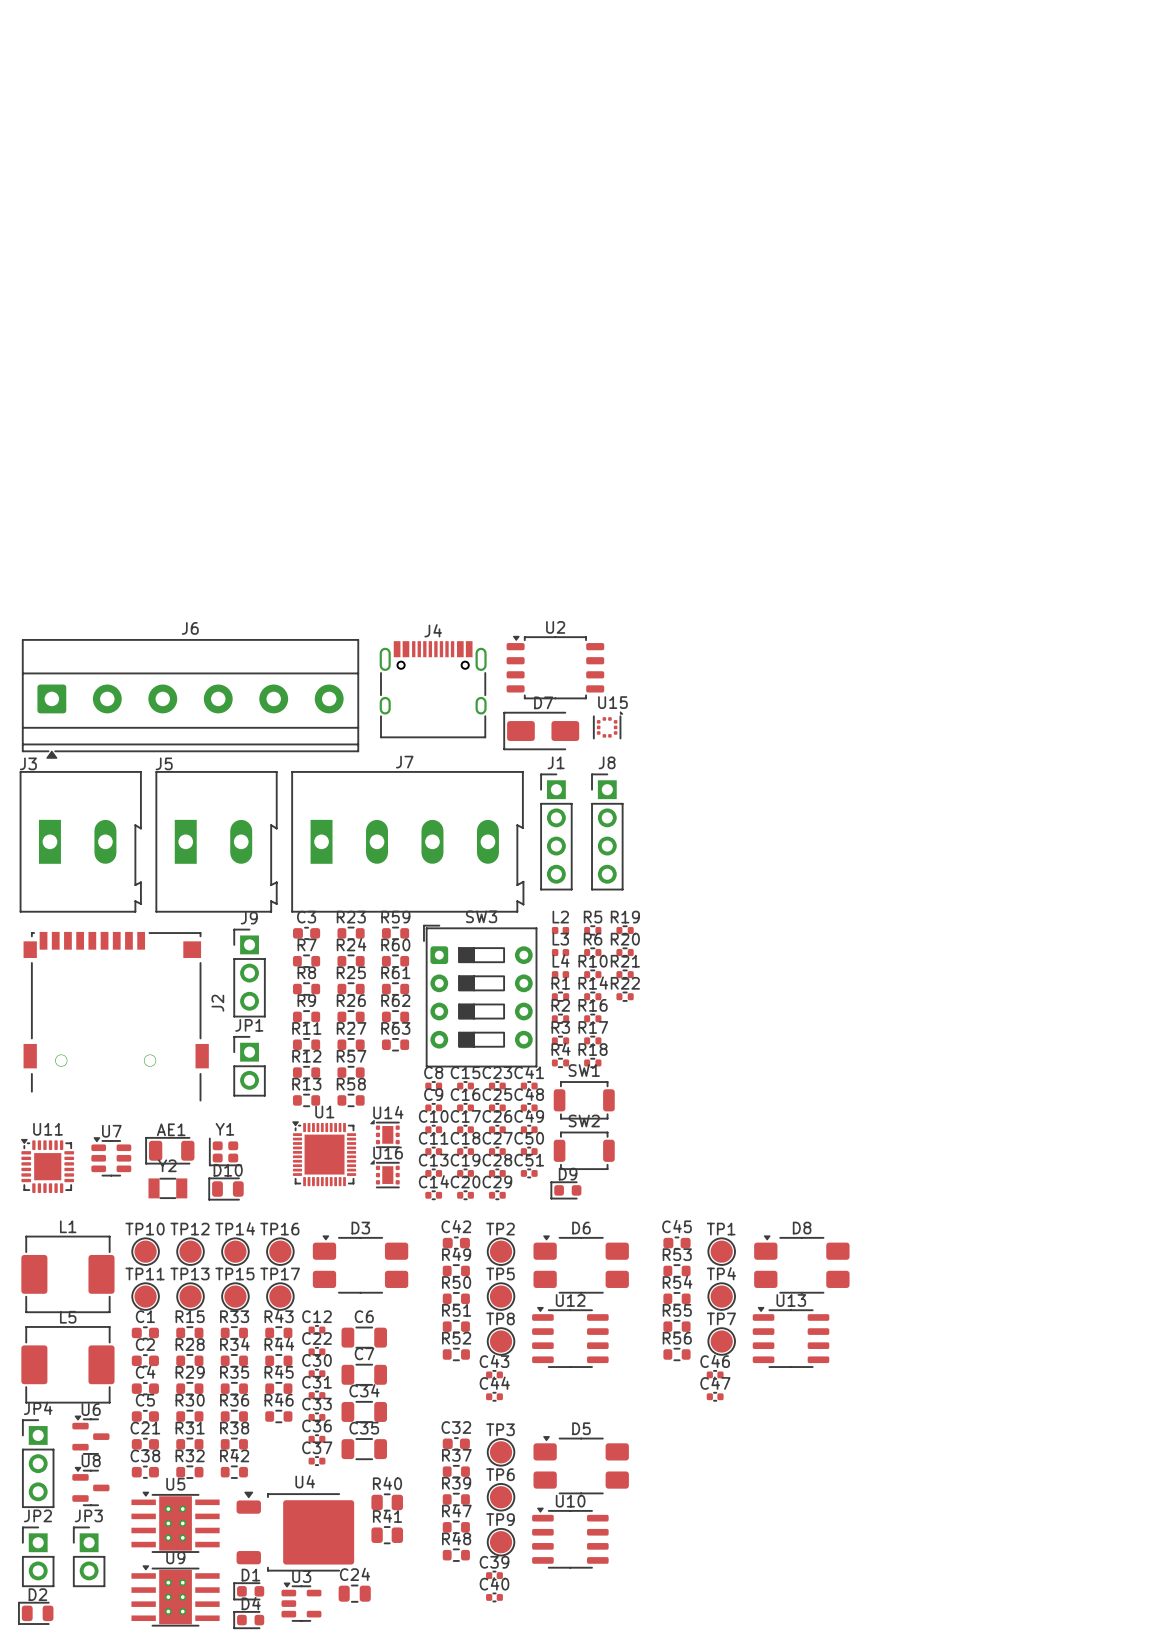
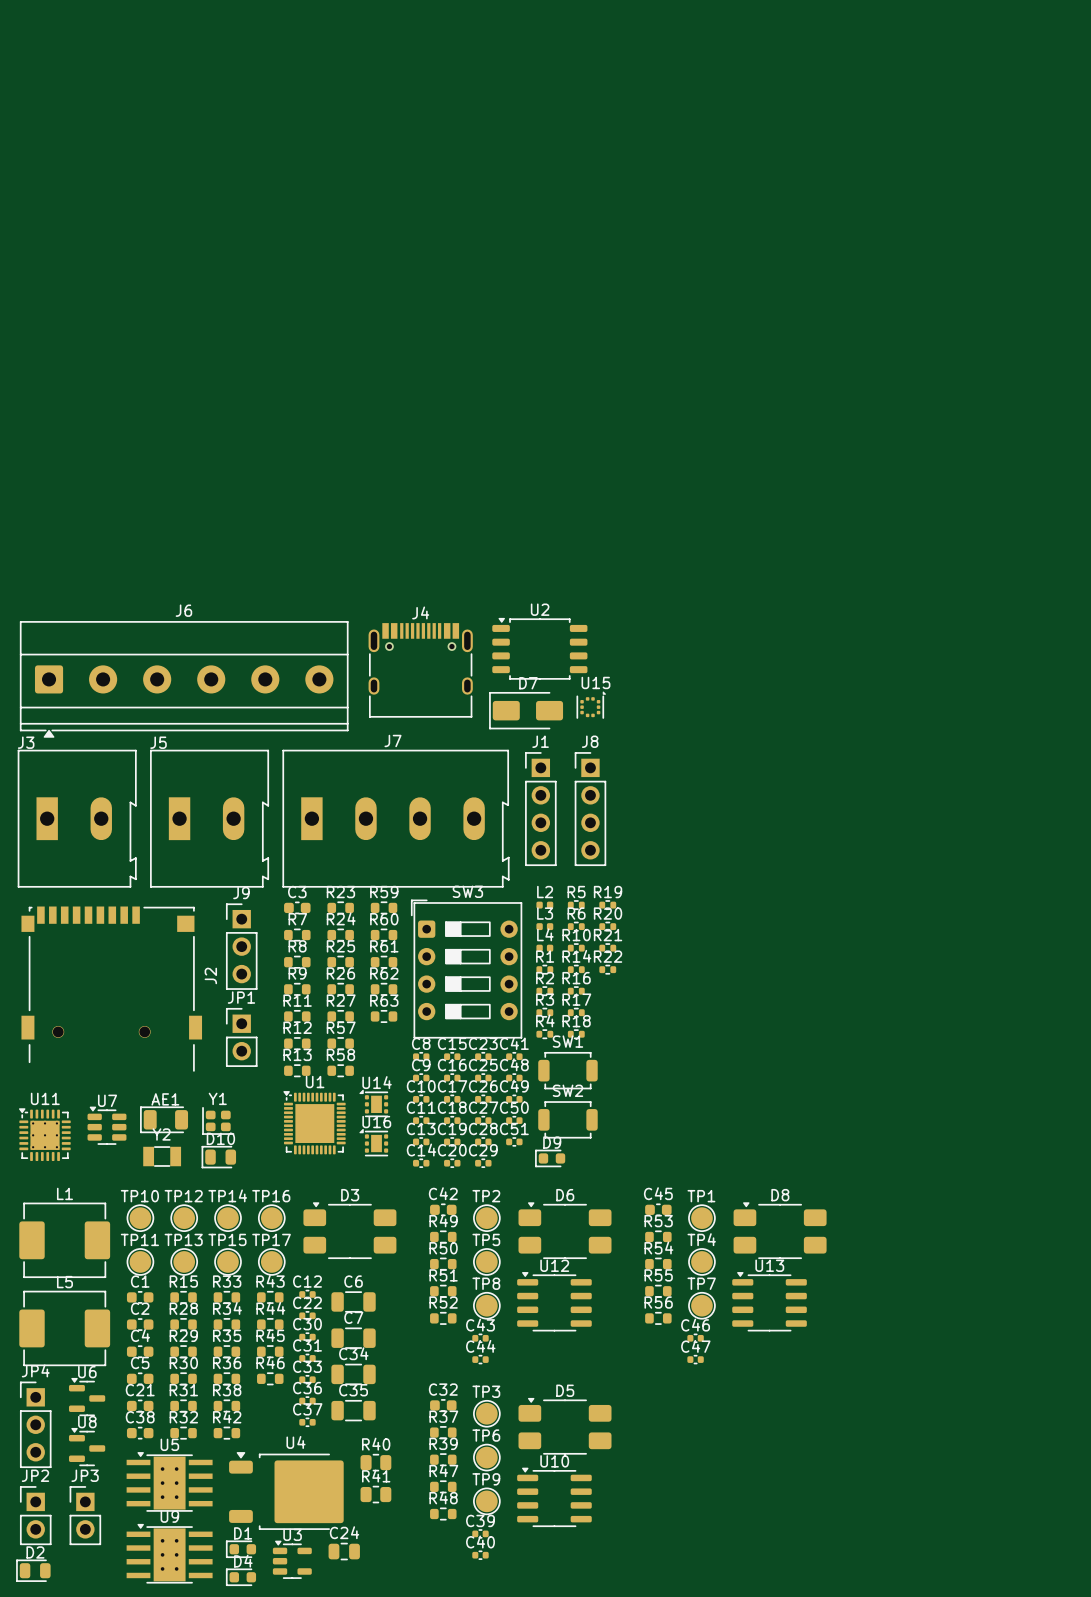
U11 footprint: [21, 1138, 75, 1194] -> [18, 1108, 71, 1162]

